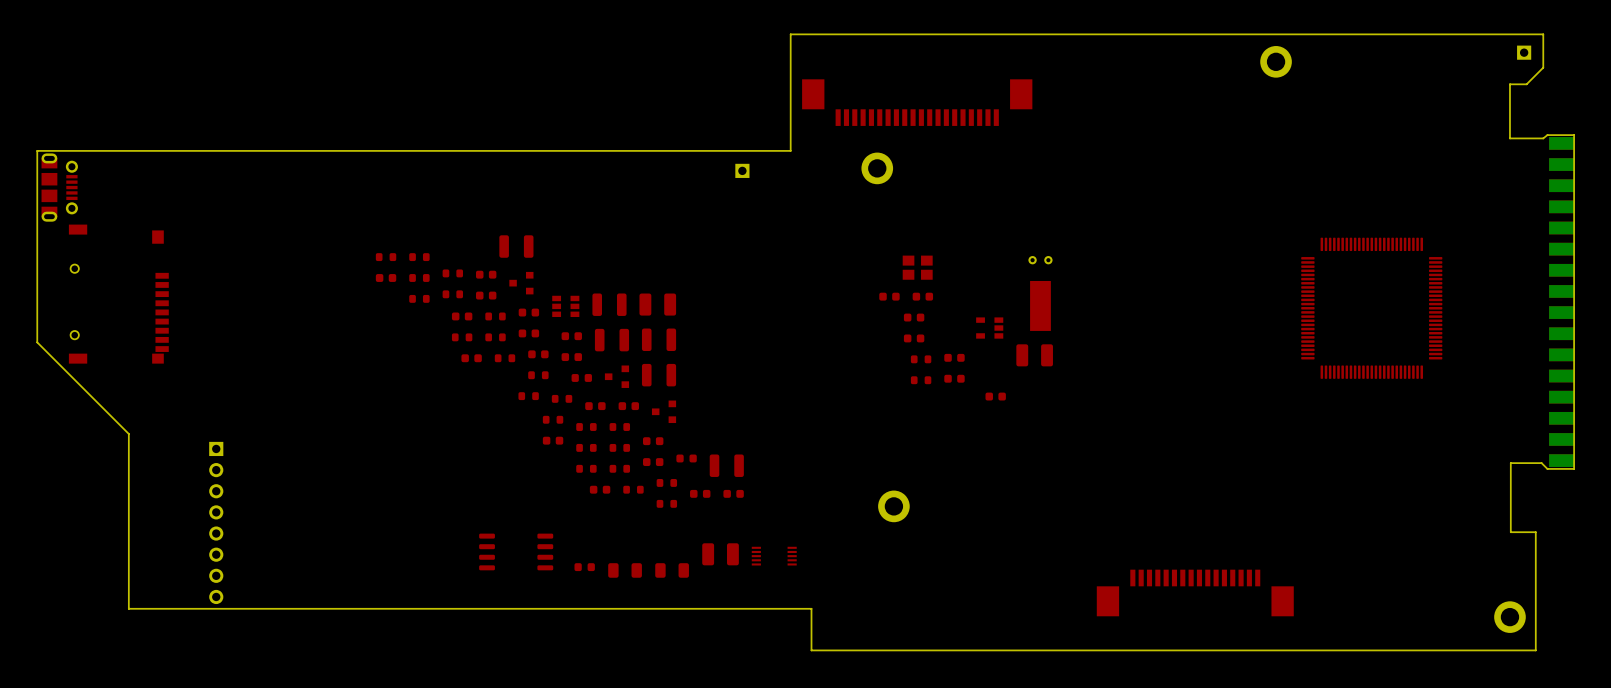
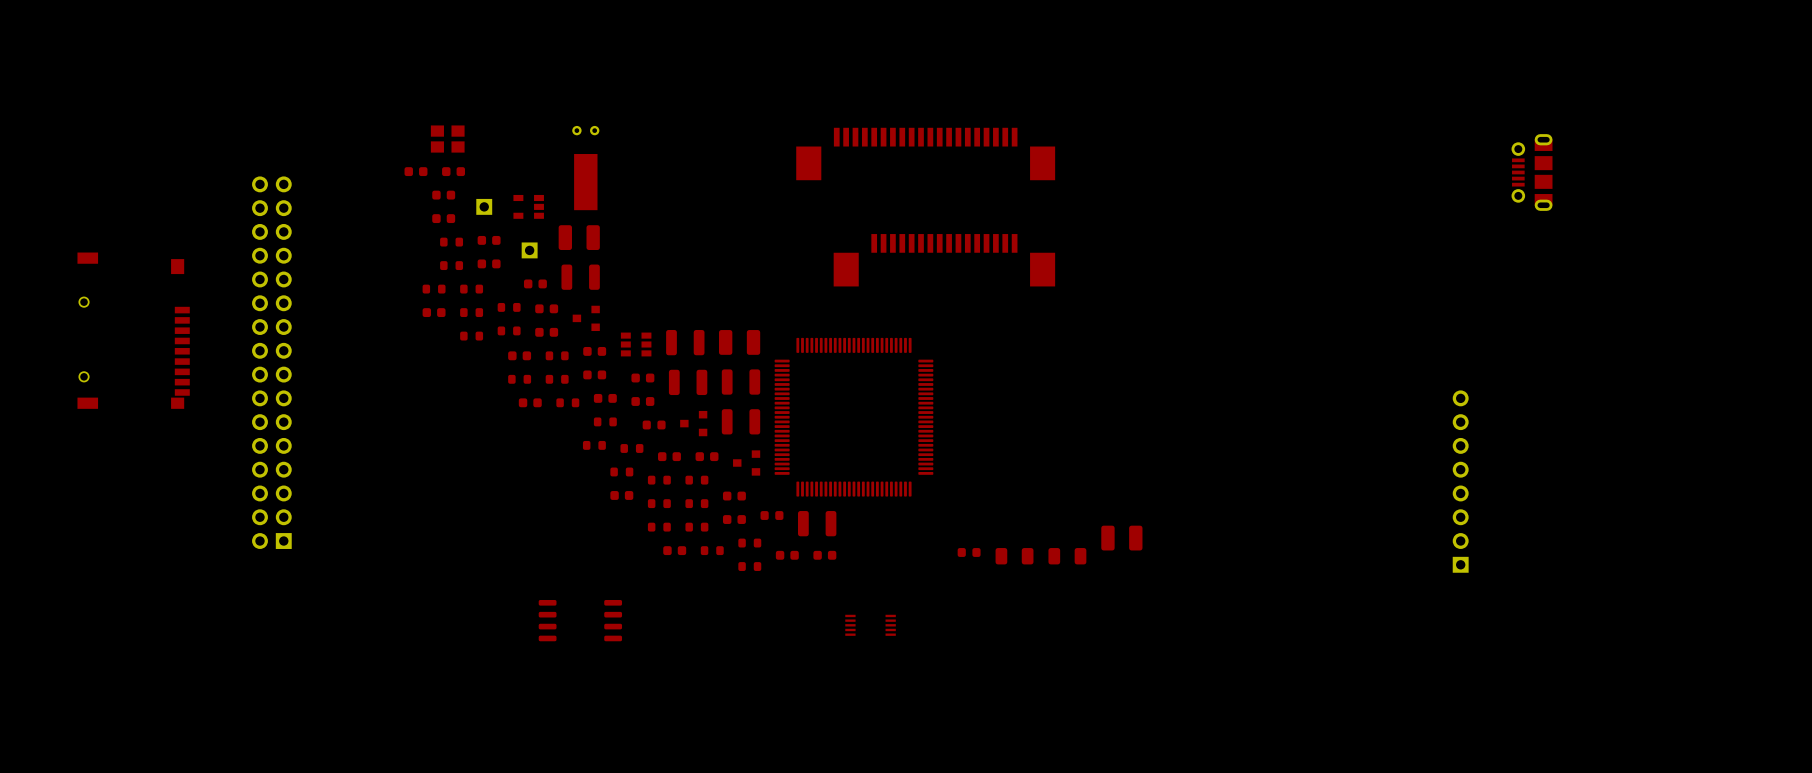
board edge: (1543, 34) (1543, 67) (1526, 84) (1509, 84) (1509, 138) (1543, 138) (1547, 135) (1574, 135) (1574, 468) (1547, 468) (1541, 463) (1510, 463) (1510, 532) (1535, 532) (1535, 650) (811, 650) (811, 608) (128, 608) (128, 433) (37, 342) (37, 150) (790, 150) (790, 34) (1543, 34) -> none
part: (1524, 52) -> none
part: (1276, 61) -> none
part rotation: 0° (917, 102) -> 180° (925, 154)
part: none -> (447, 139)
part: none -> (585, 168)
part: none -> (415, 171)
part: none -> (453, 171)
part: none -> (1532, 172)
part: (877, 168) -> none
part: (742, 170) -> none
part: none -> (443, 195)
part: none -> (484, 206)
part: none -> (528, 206)
part: (59, 187) -> none
part: none -> (443, 218)
part: none -> (579, 237)
part: none -> (489, 240)
part: none -> (451, 242)
part: none -> (529, 250)
part: none -> (944, 260)
part: none -> (489, 263)
part: none -> (451, 265)
part: none -> (535, 283)
part: (917, 267) -> none
part: (1040, 293) -> none
part: (889, 296) -> none
part: (922, 296) -> none
part: (1561, 302) -> none
part: (1371, 308) -> none
part: (914, 317) -> none
part: none -> (271, 362)
part: (989, 328) -> none
part: (914, 338) -> none
part position: (1034, 355) -> (1121, 538)
part: (954, 357) -> none
part: (921, 359) -> none
part: none -> (853, 417)
part: (954, 378) -> none
part: (921, 380) -> none
part: (995, 396) -> none
part: none -> (1460, 481)
part: none -> (969, 552)
part: none -> (1014, 556)
part: none -> (1067, 556)
part: (893, 506) -> none
part: (216, 522) -> none
part: (720, 554) -> none
part: (584, 567) -> none
part: (625, 570) -> none
part: (672, 570) -> none
part: (1195, 592) -> none
part: (1509, 617) -> none

